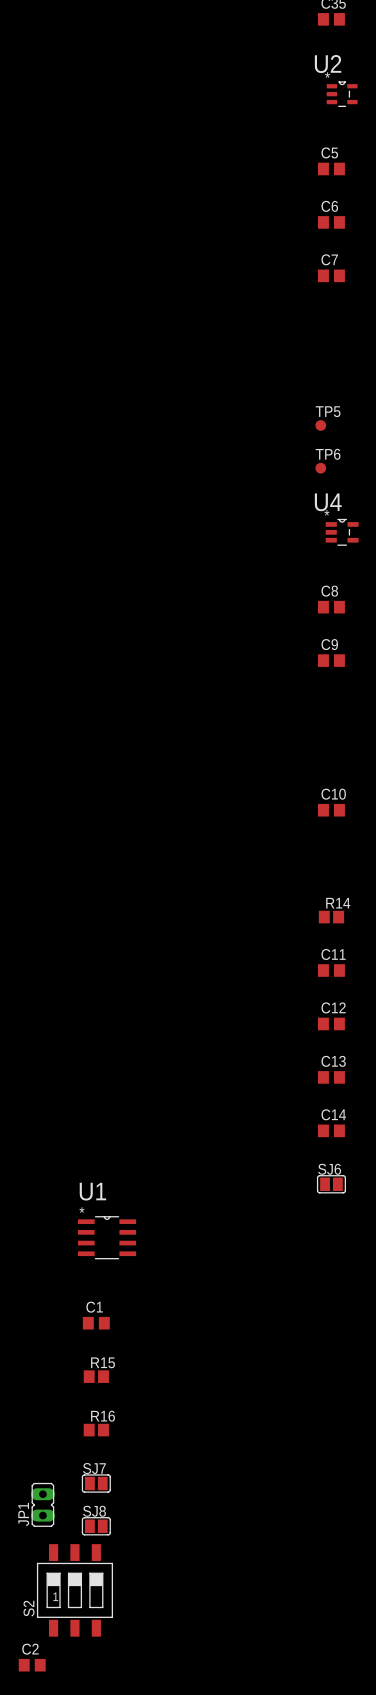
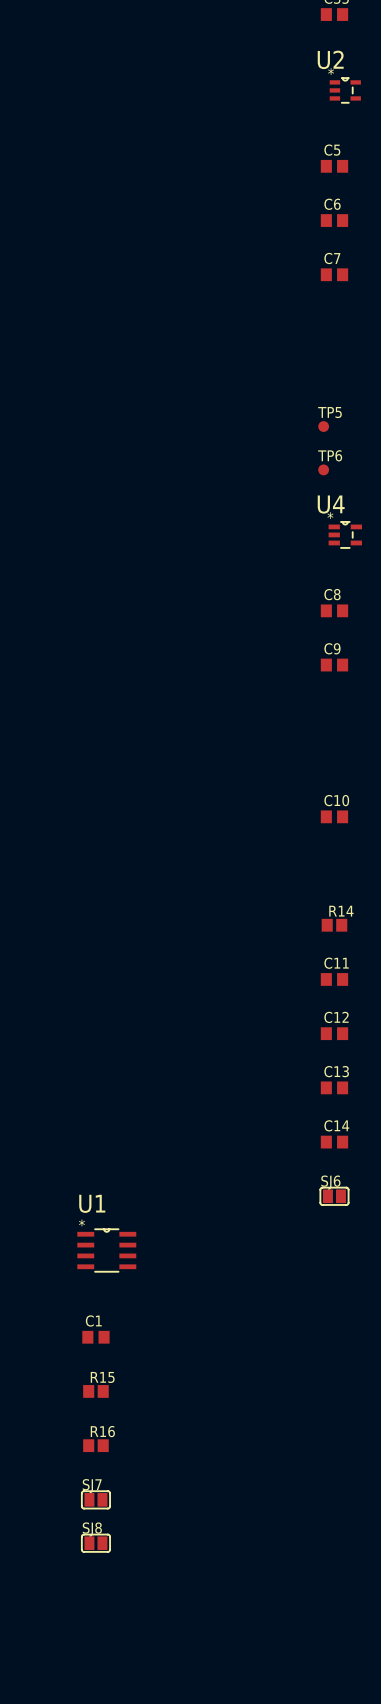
JP1: (42, 1504) -> none
S2: (74, 1590) -> none
C2: (32, 1665) -> none

